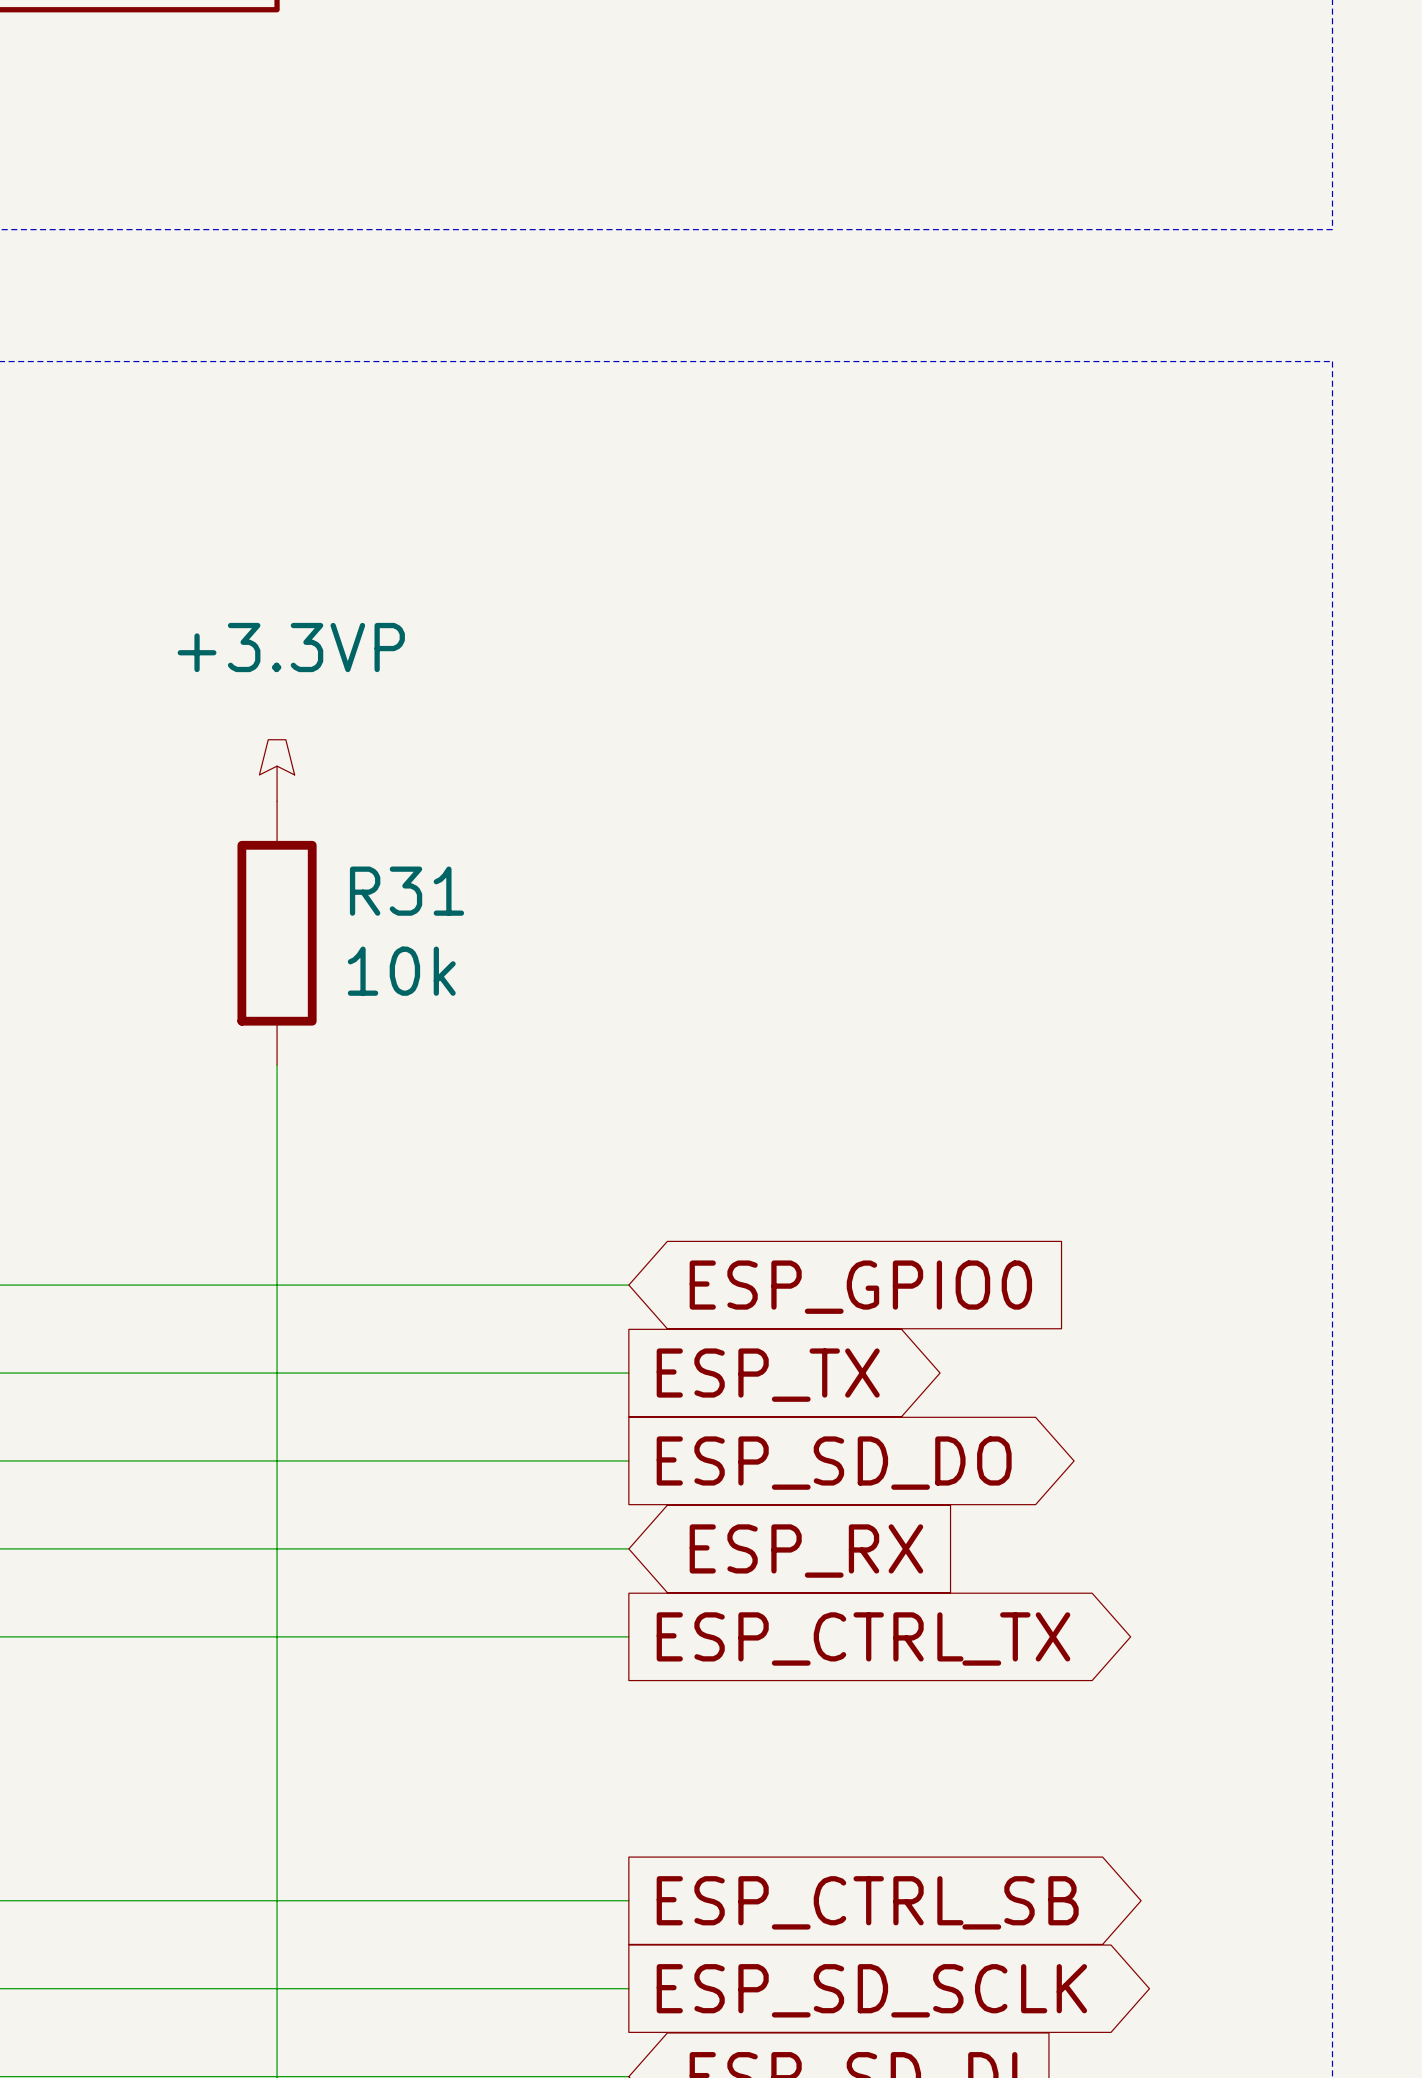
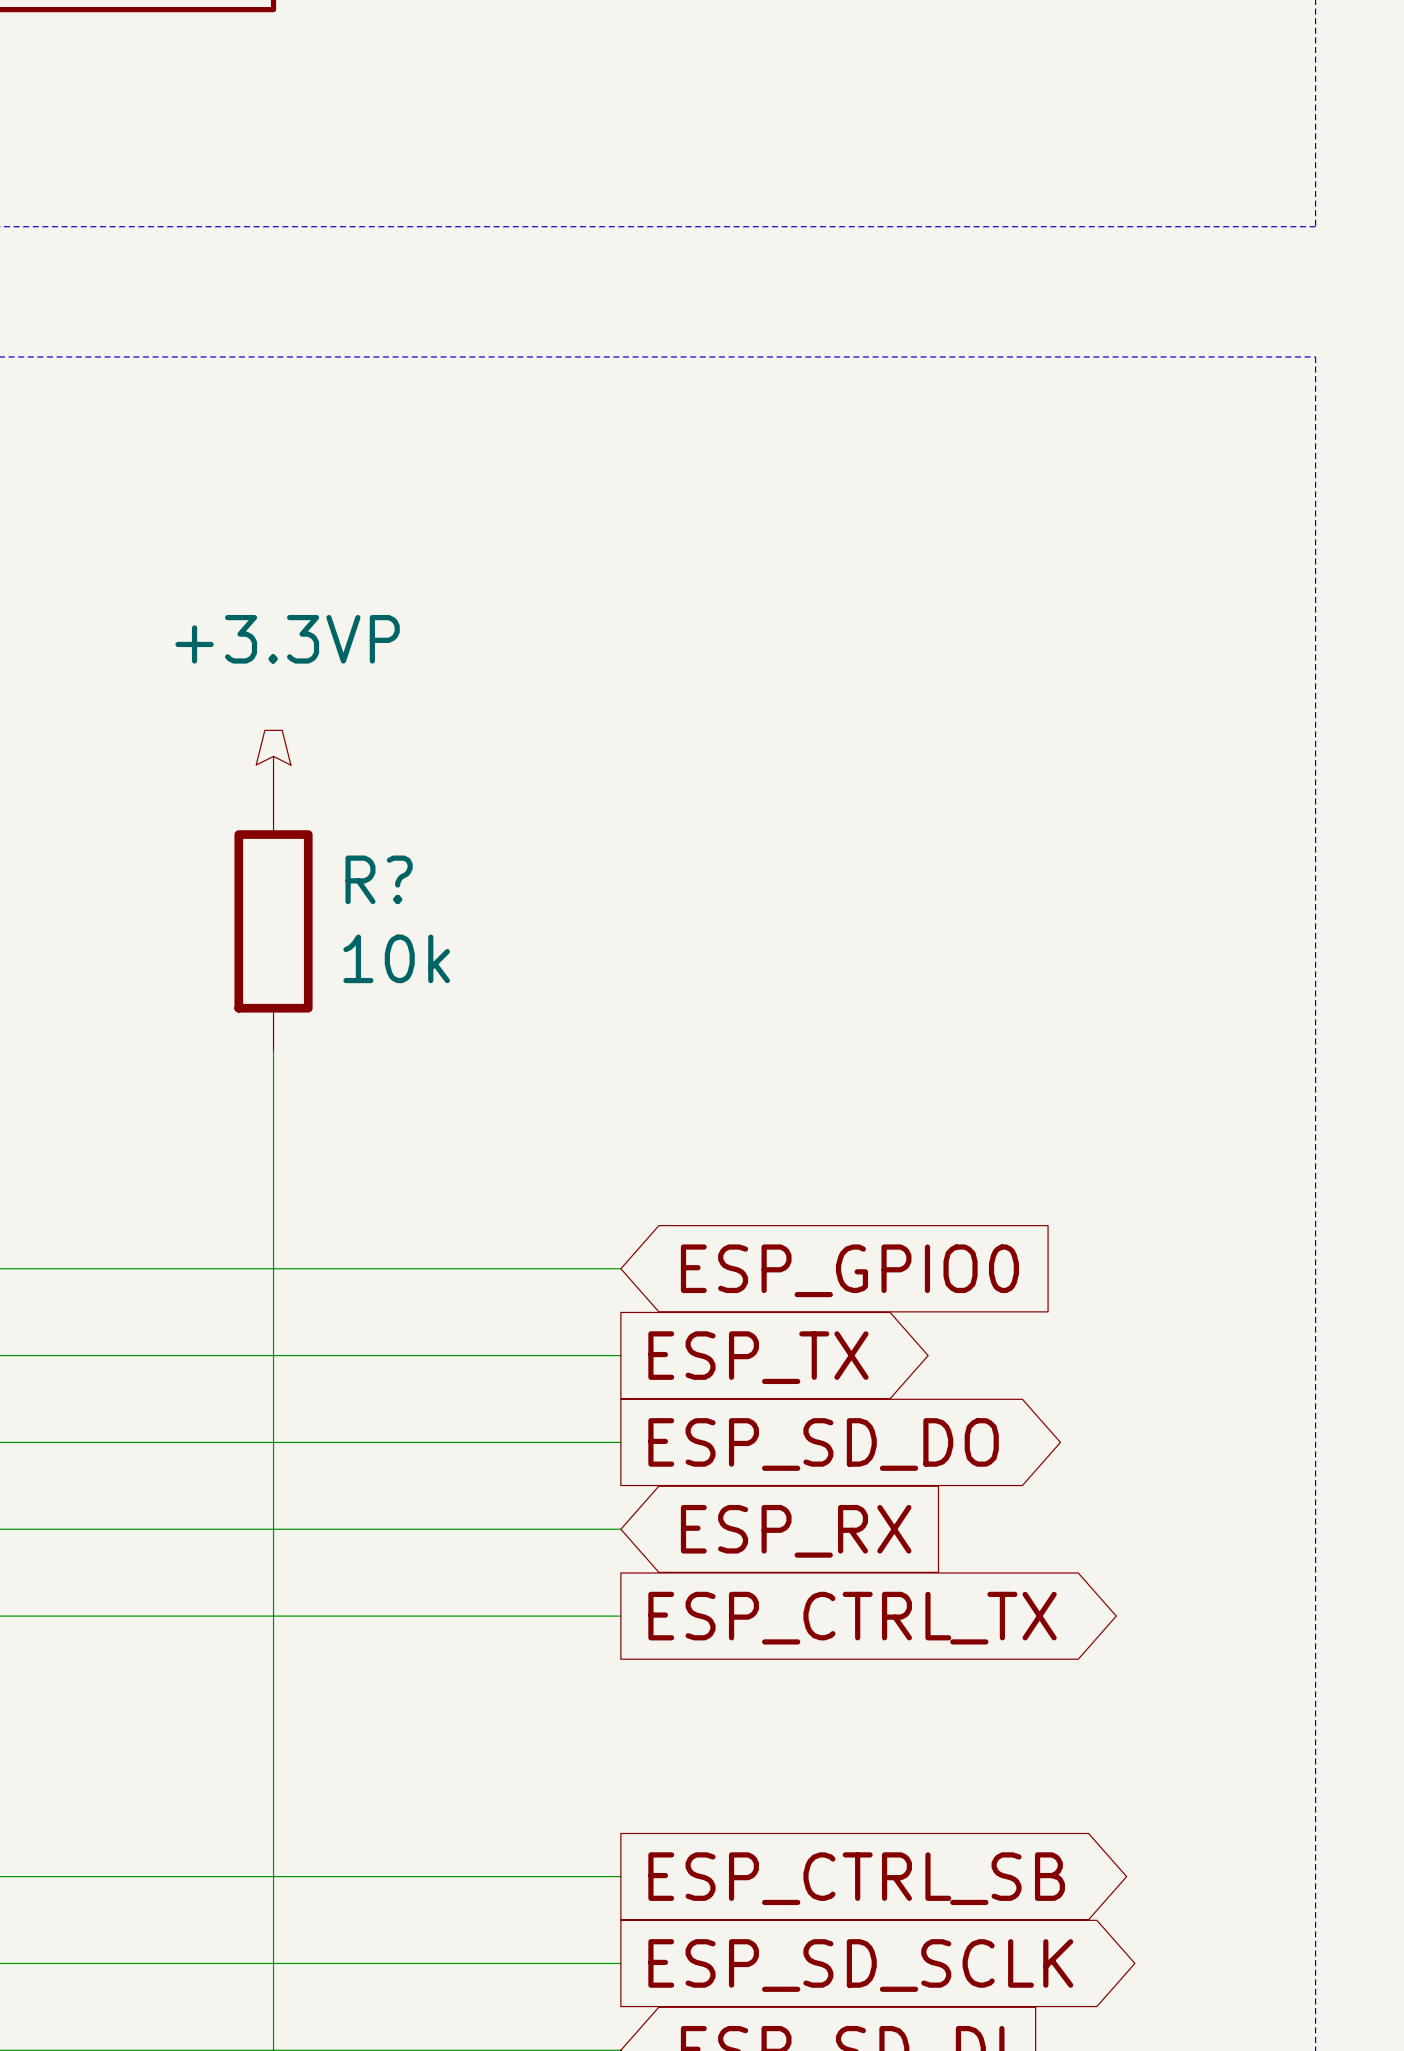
R31 name: R31 (407, 891) -> R? (379, 879)

